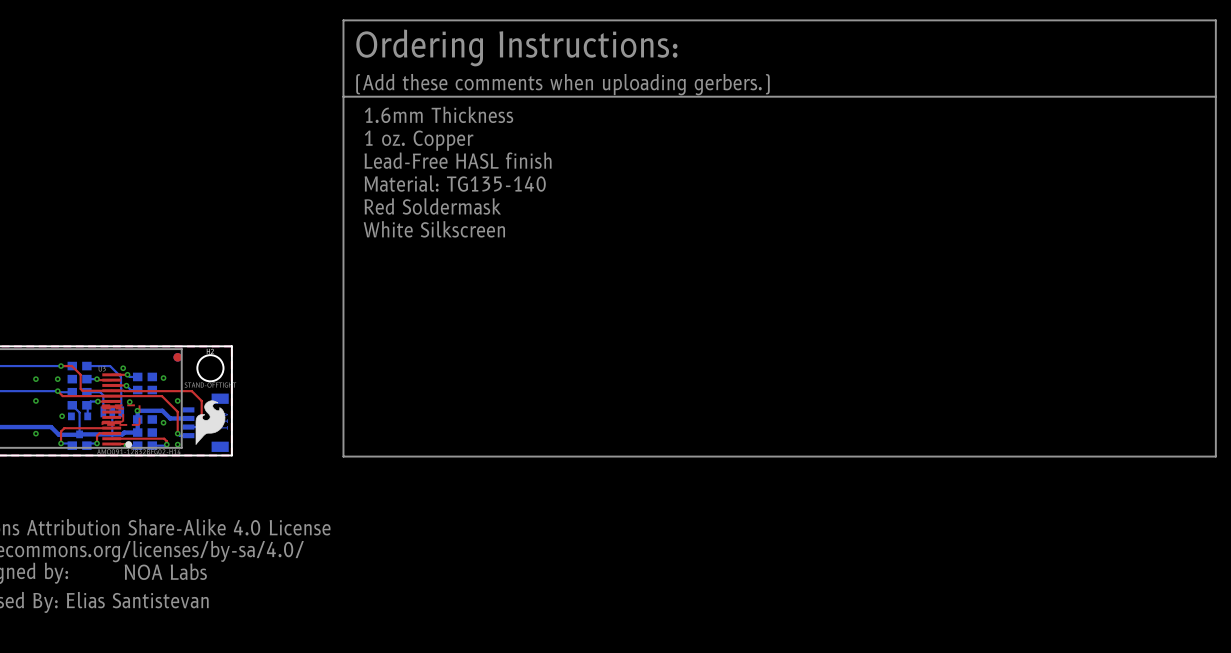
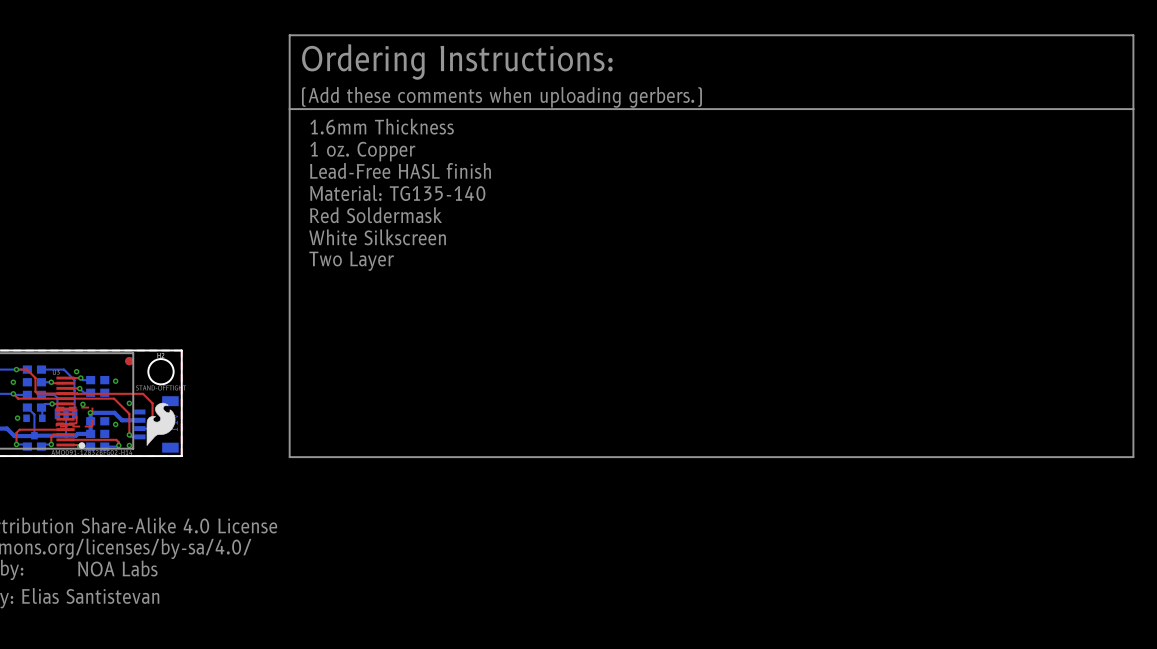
text: none -> Two Layer (351, 261)

